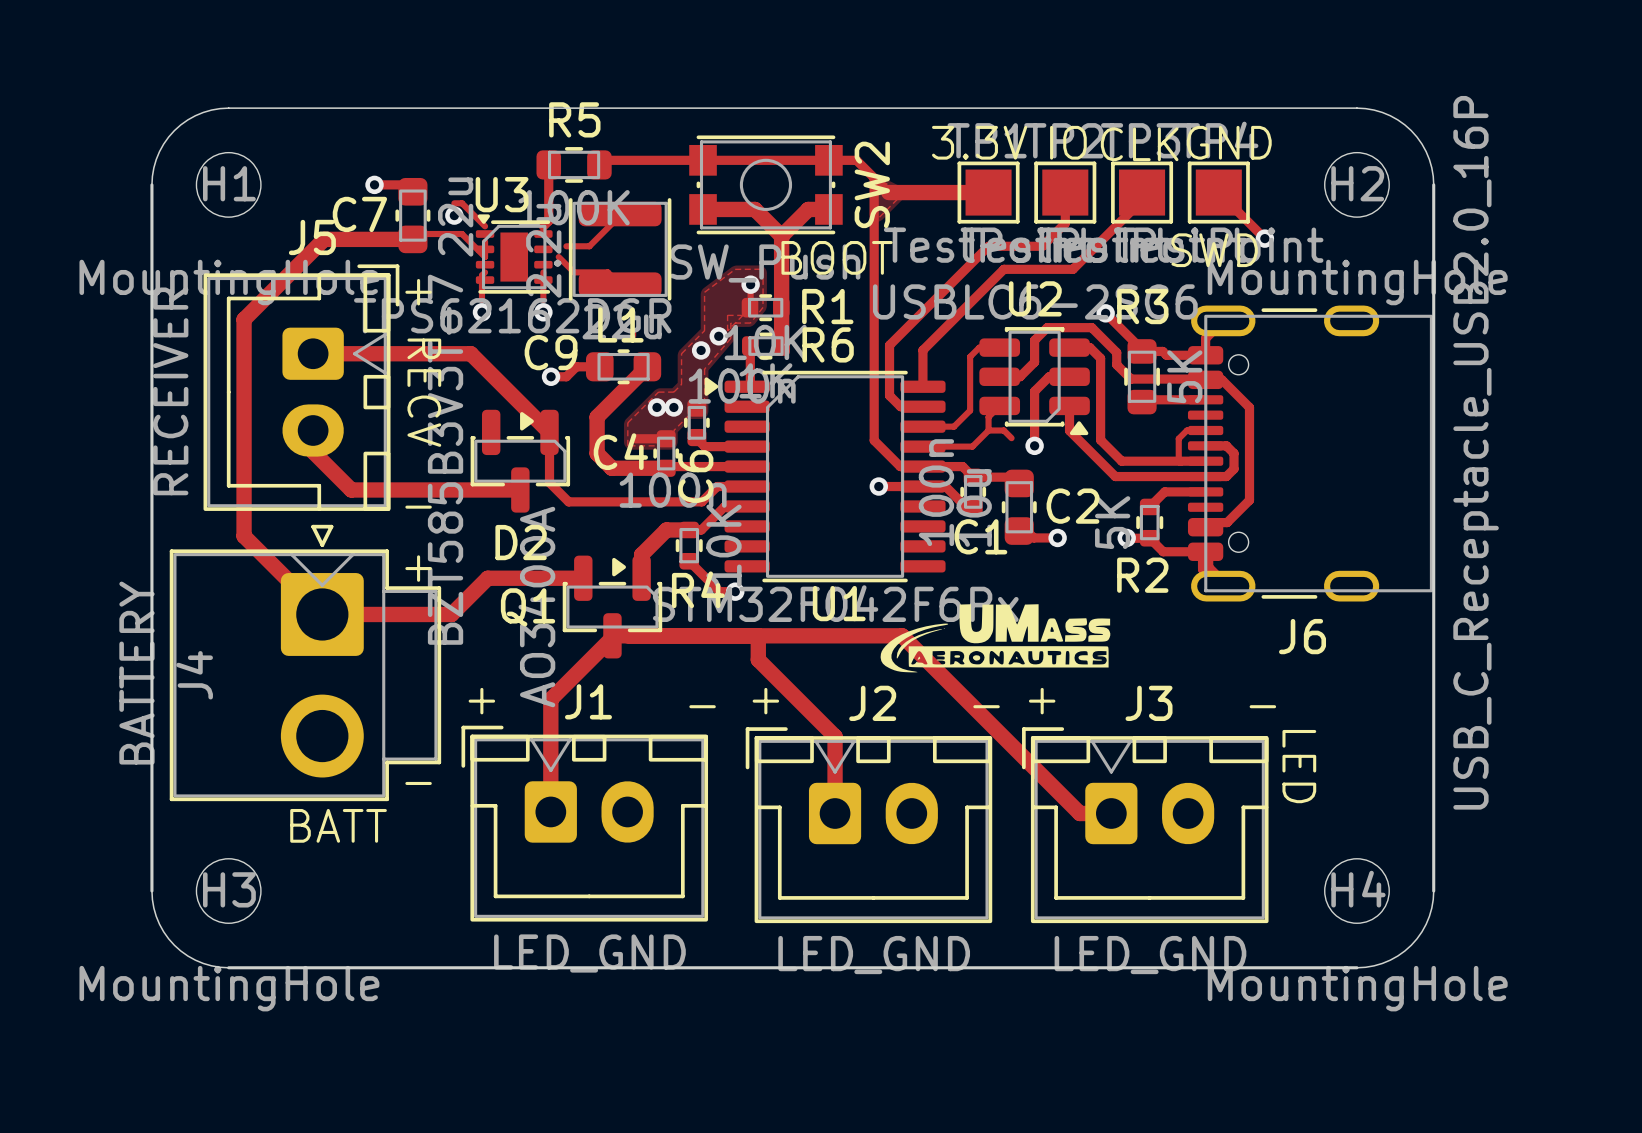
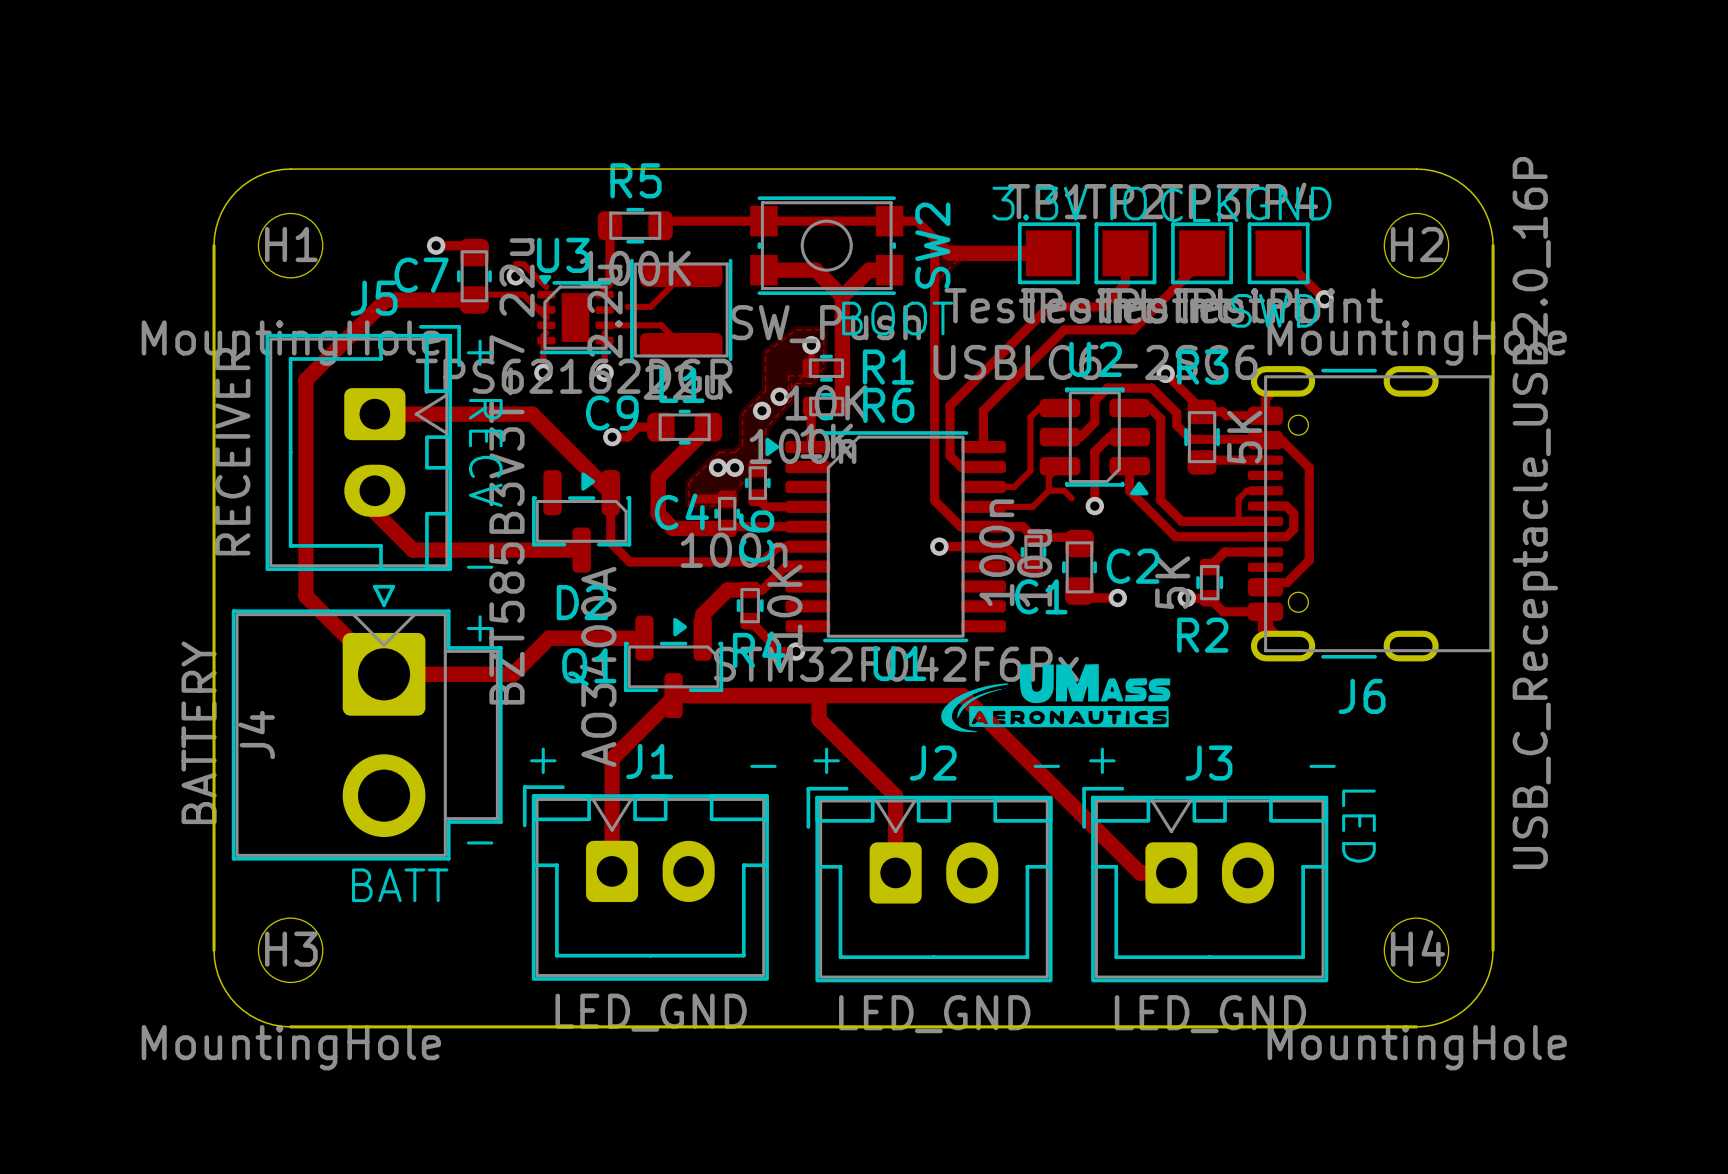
track: (558, 257) (574, 272) (607, 272) -> (604, 325) (661, 325) (668, 332)

